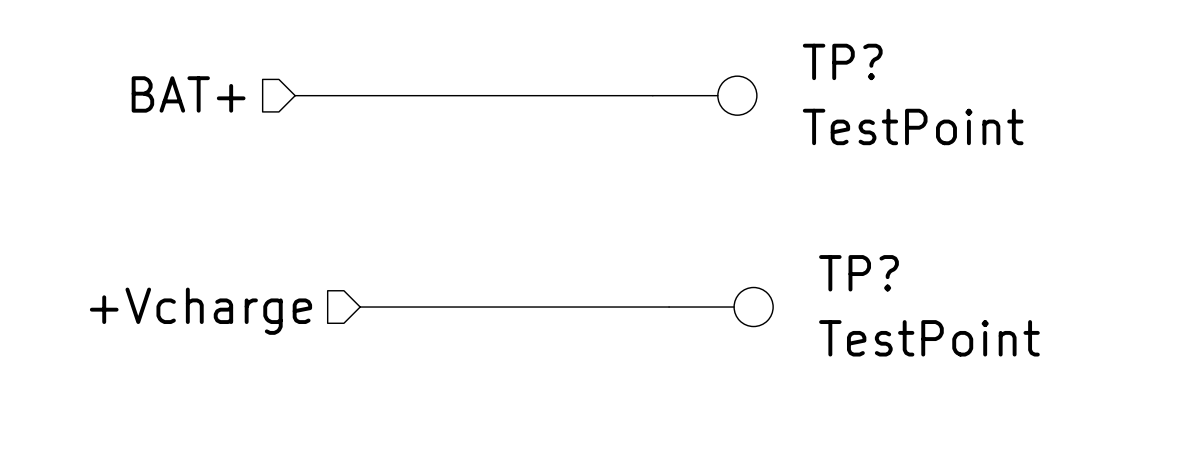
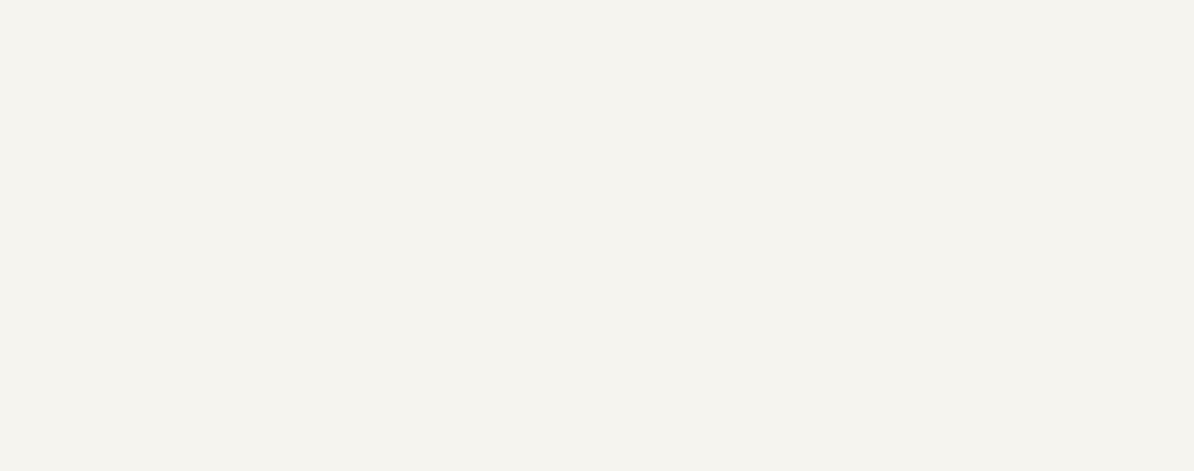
hierarchical label: BAT+ (188, 94) -> none
wire: (295, 95) (652, 95) -> none
TP?: TestPoint (704, 95) -> none
wire: (360, 307) (669, 307) -> none
TP?: TestPoint (721, 307) -> none
hierarchical label: +Vcharge (200, 311) -> none

